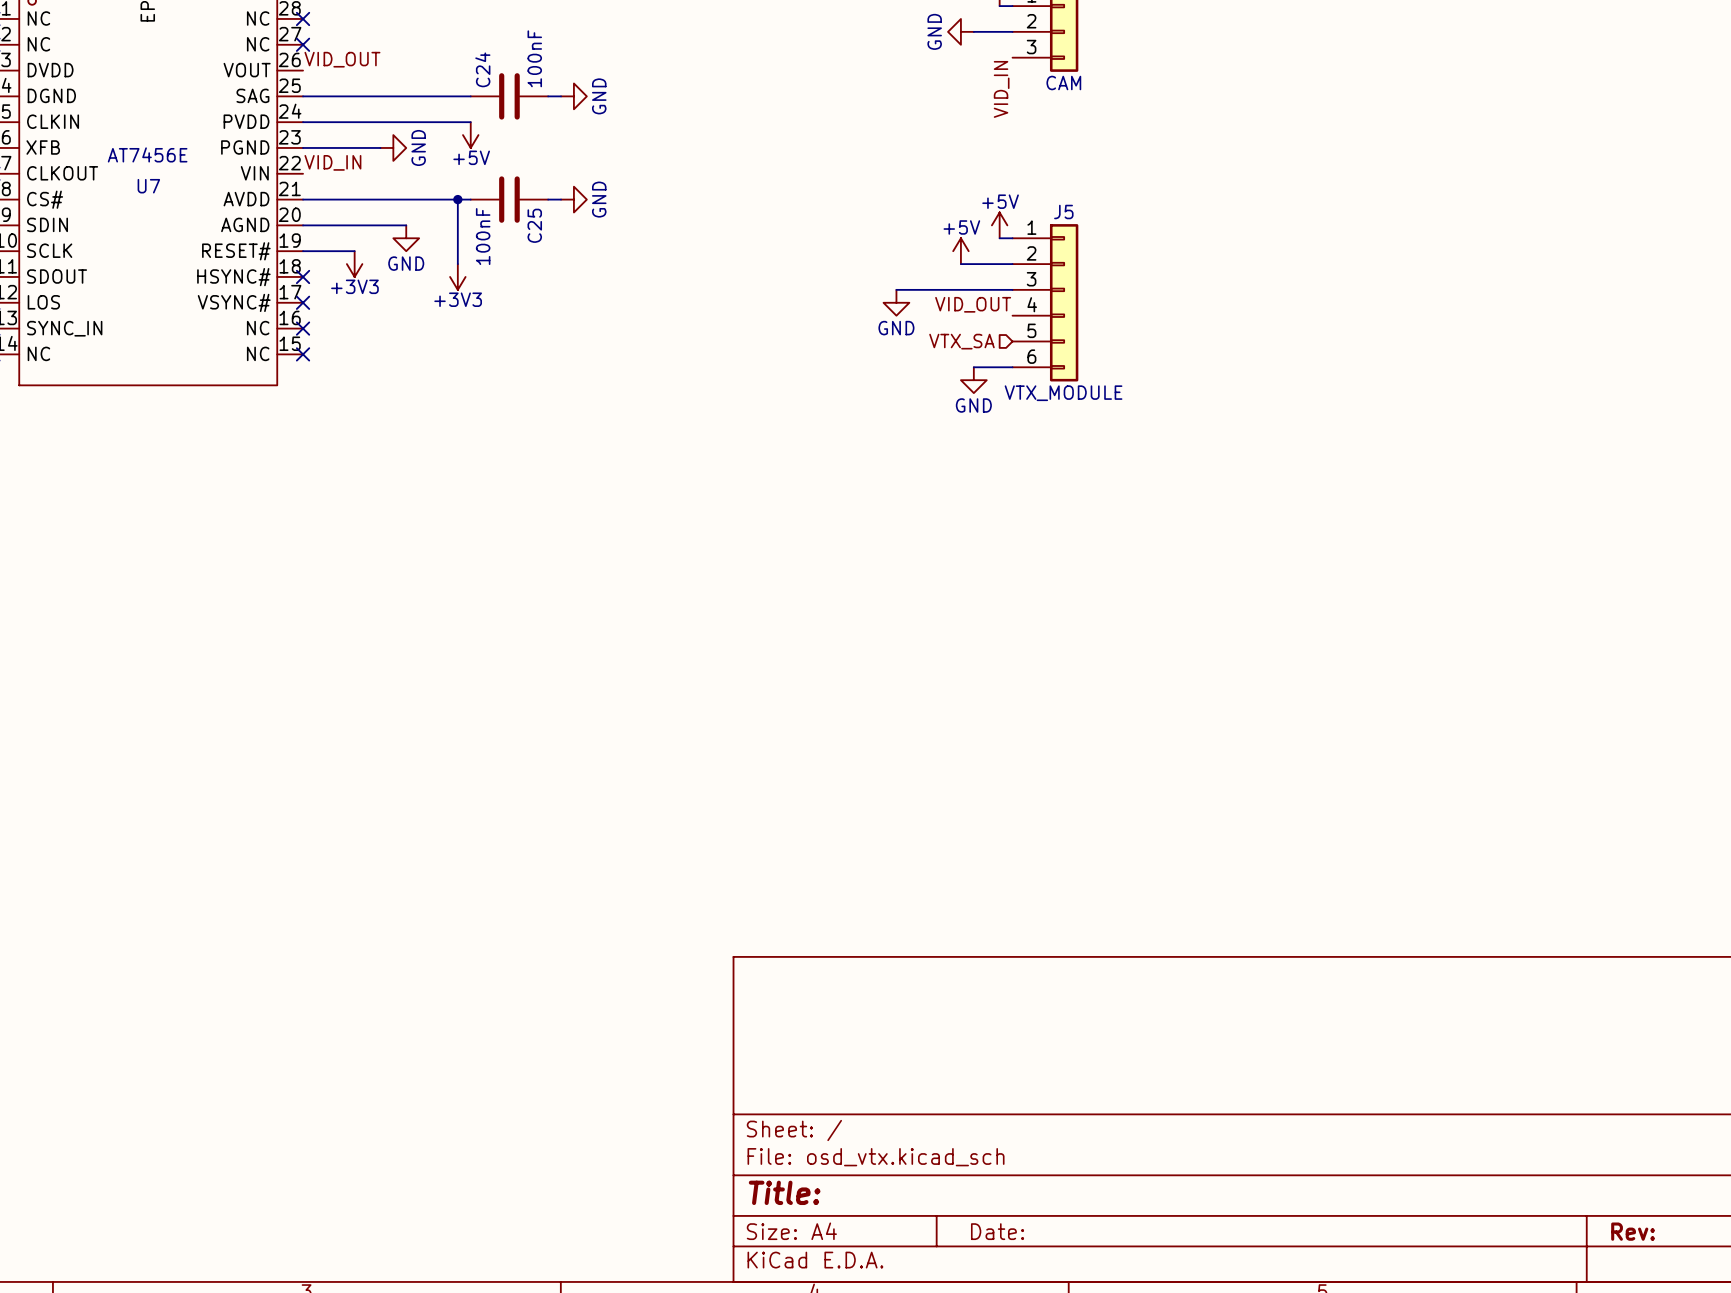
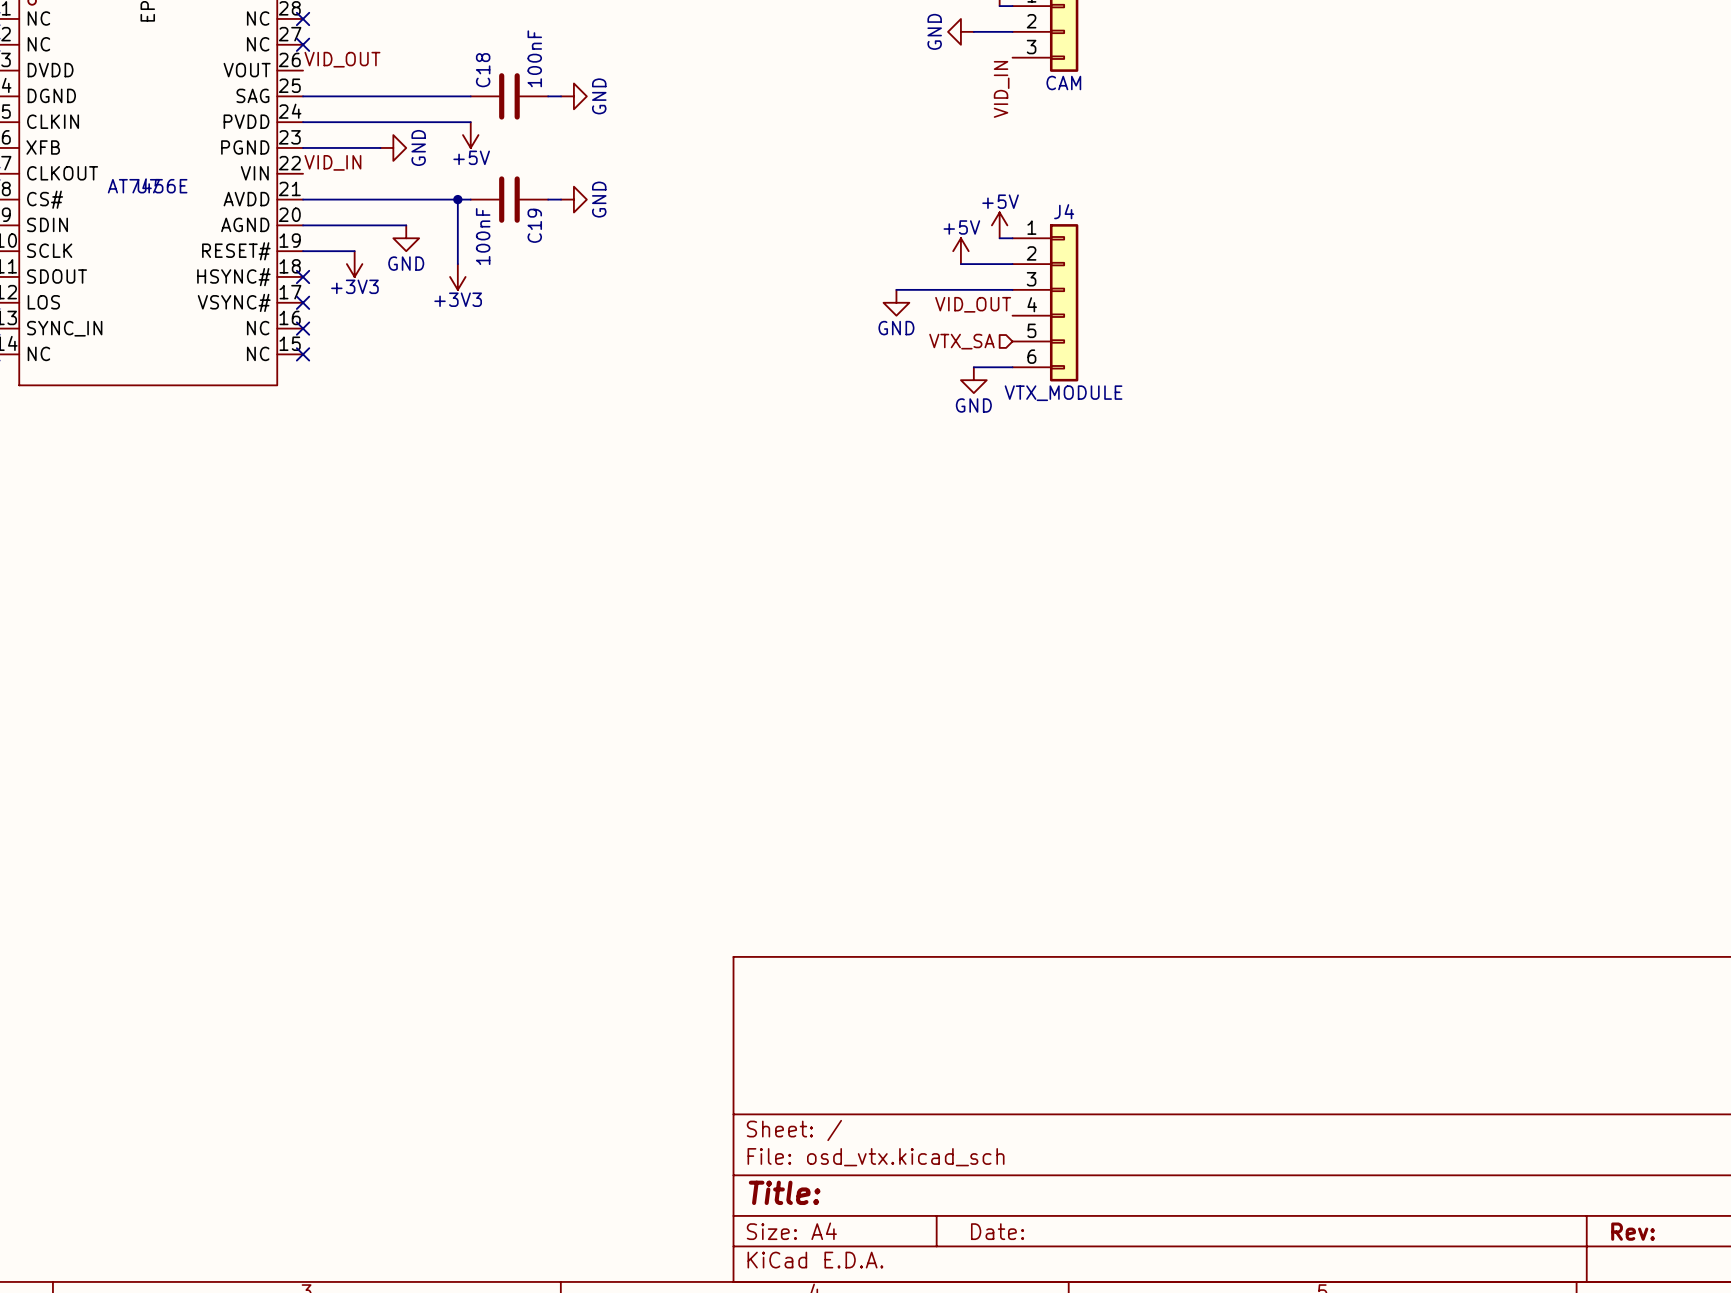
C24 name: C24 (482, 69) -> C18 (483, 70)
U7 value position: AT7456E (147, 154) -> AT7456E (147, 185)
J5 name: J5 (1063, 212) -> J4 (1064, 211)
C25 name: C25 (534, 225) -> C19 (534, 225)

